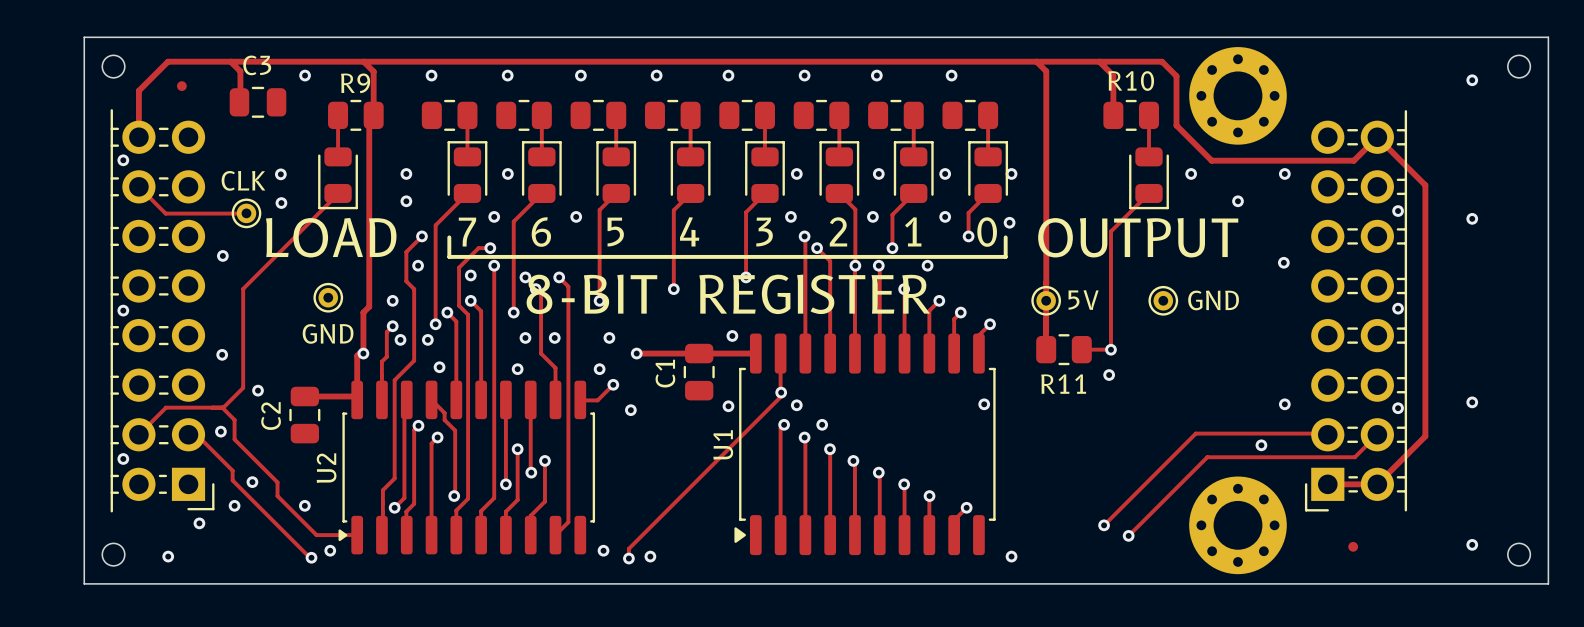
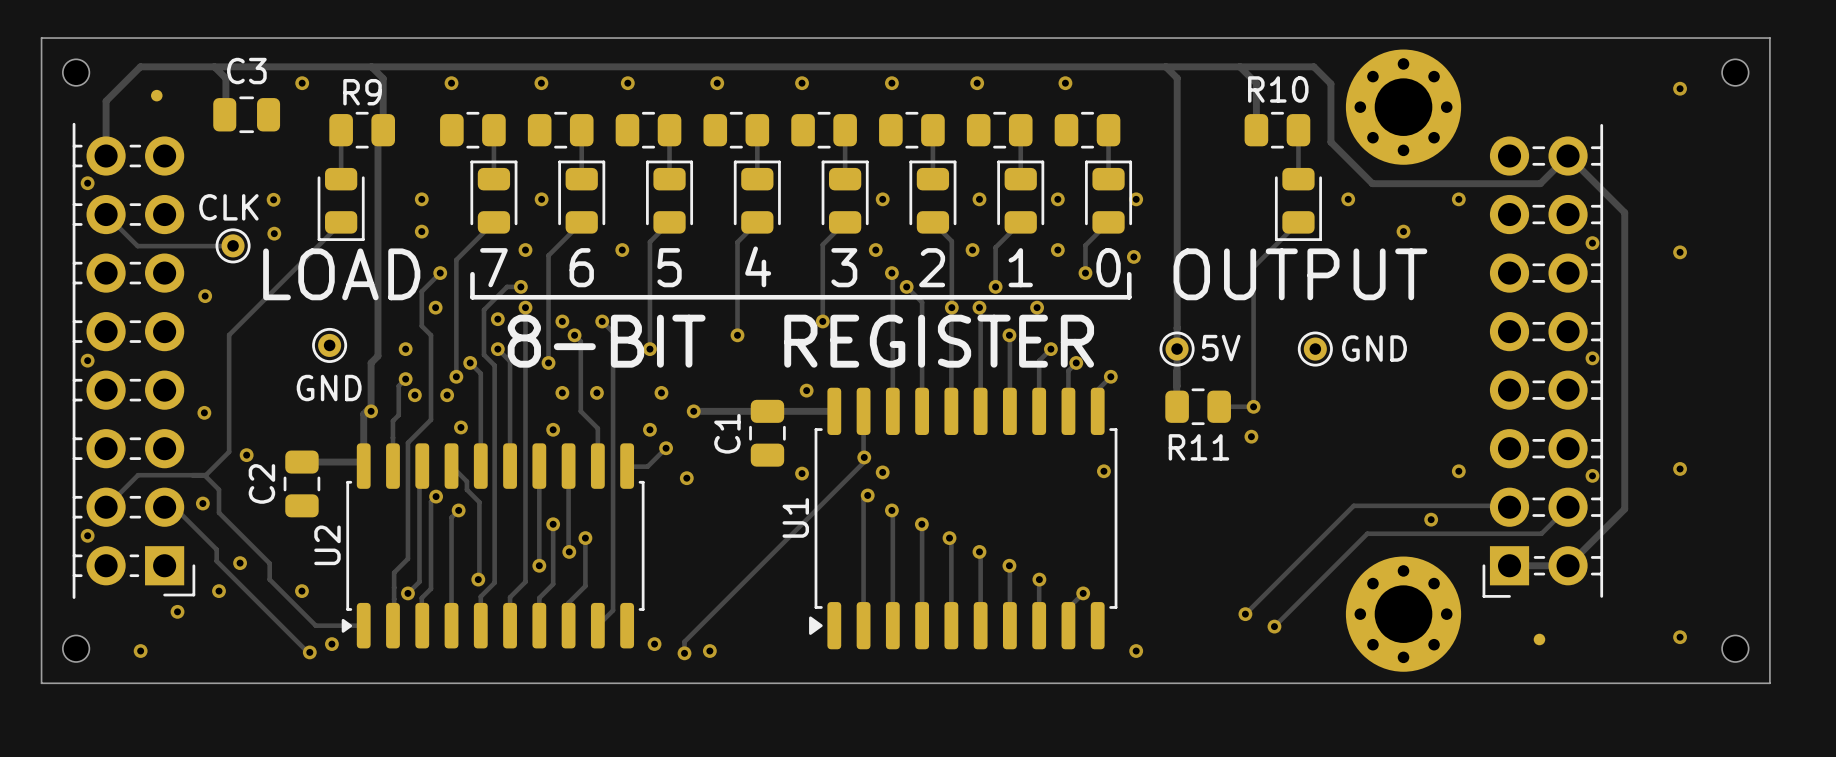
via: (1283, 262) -> none
via: (822, 424) -> none

